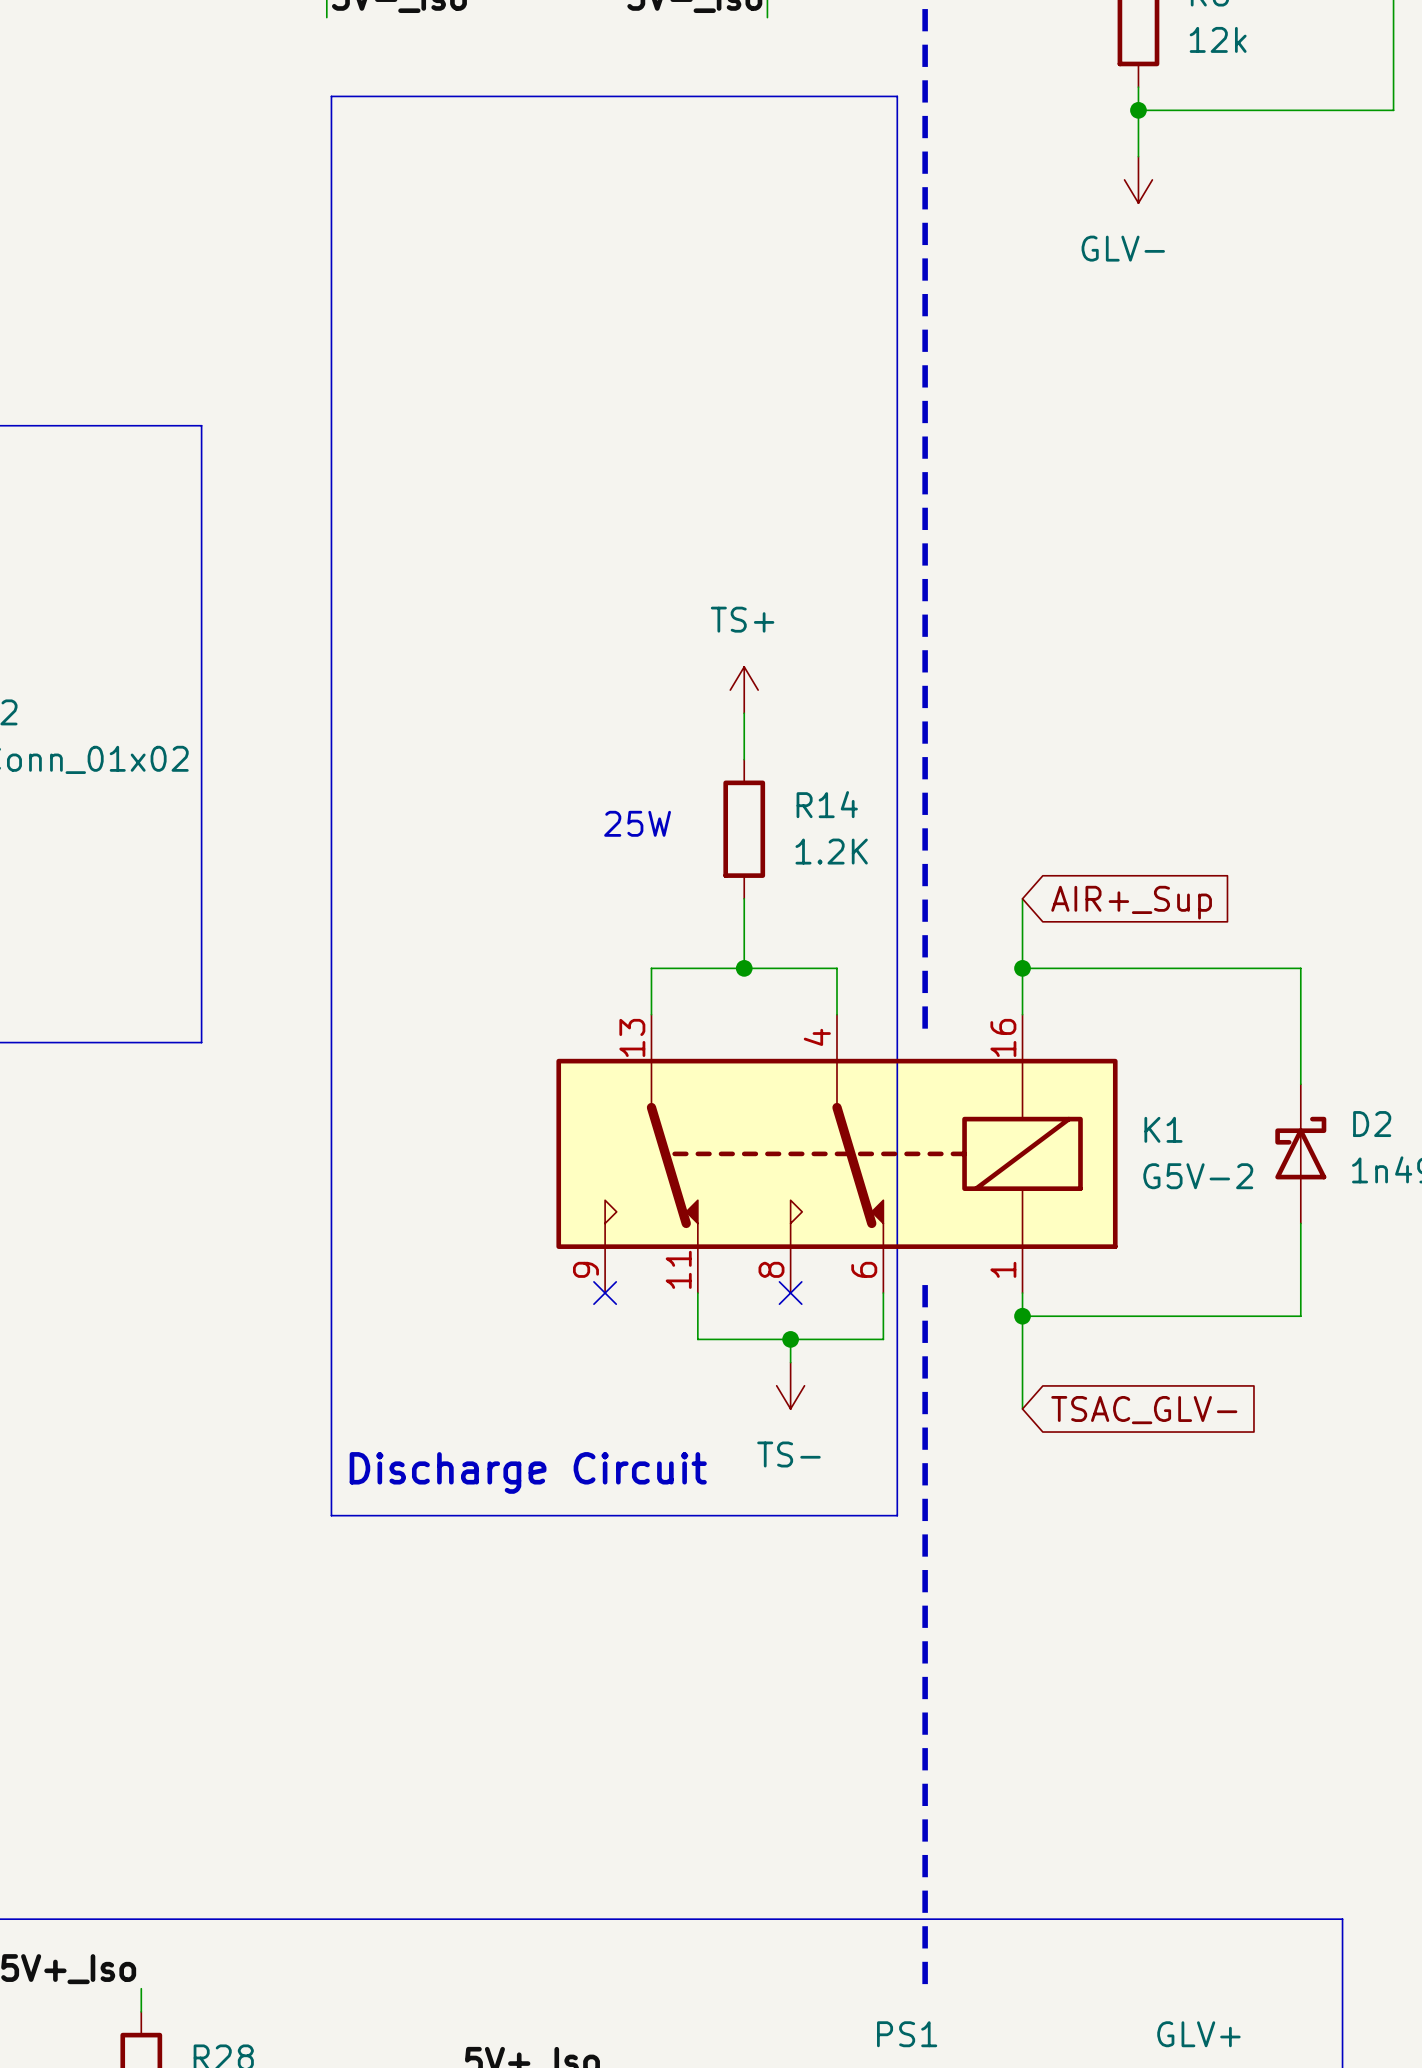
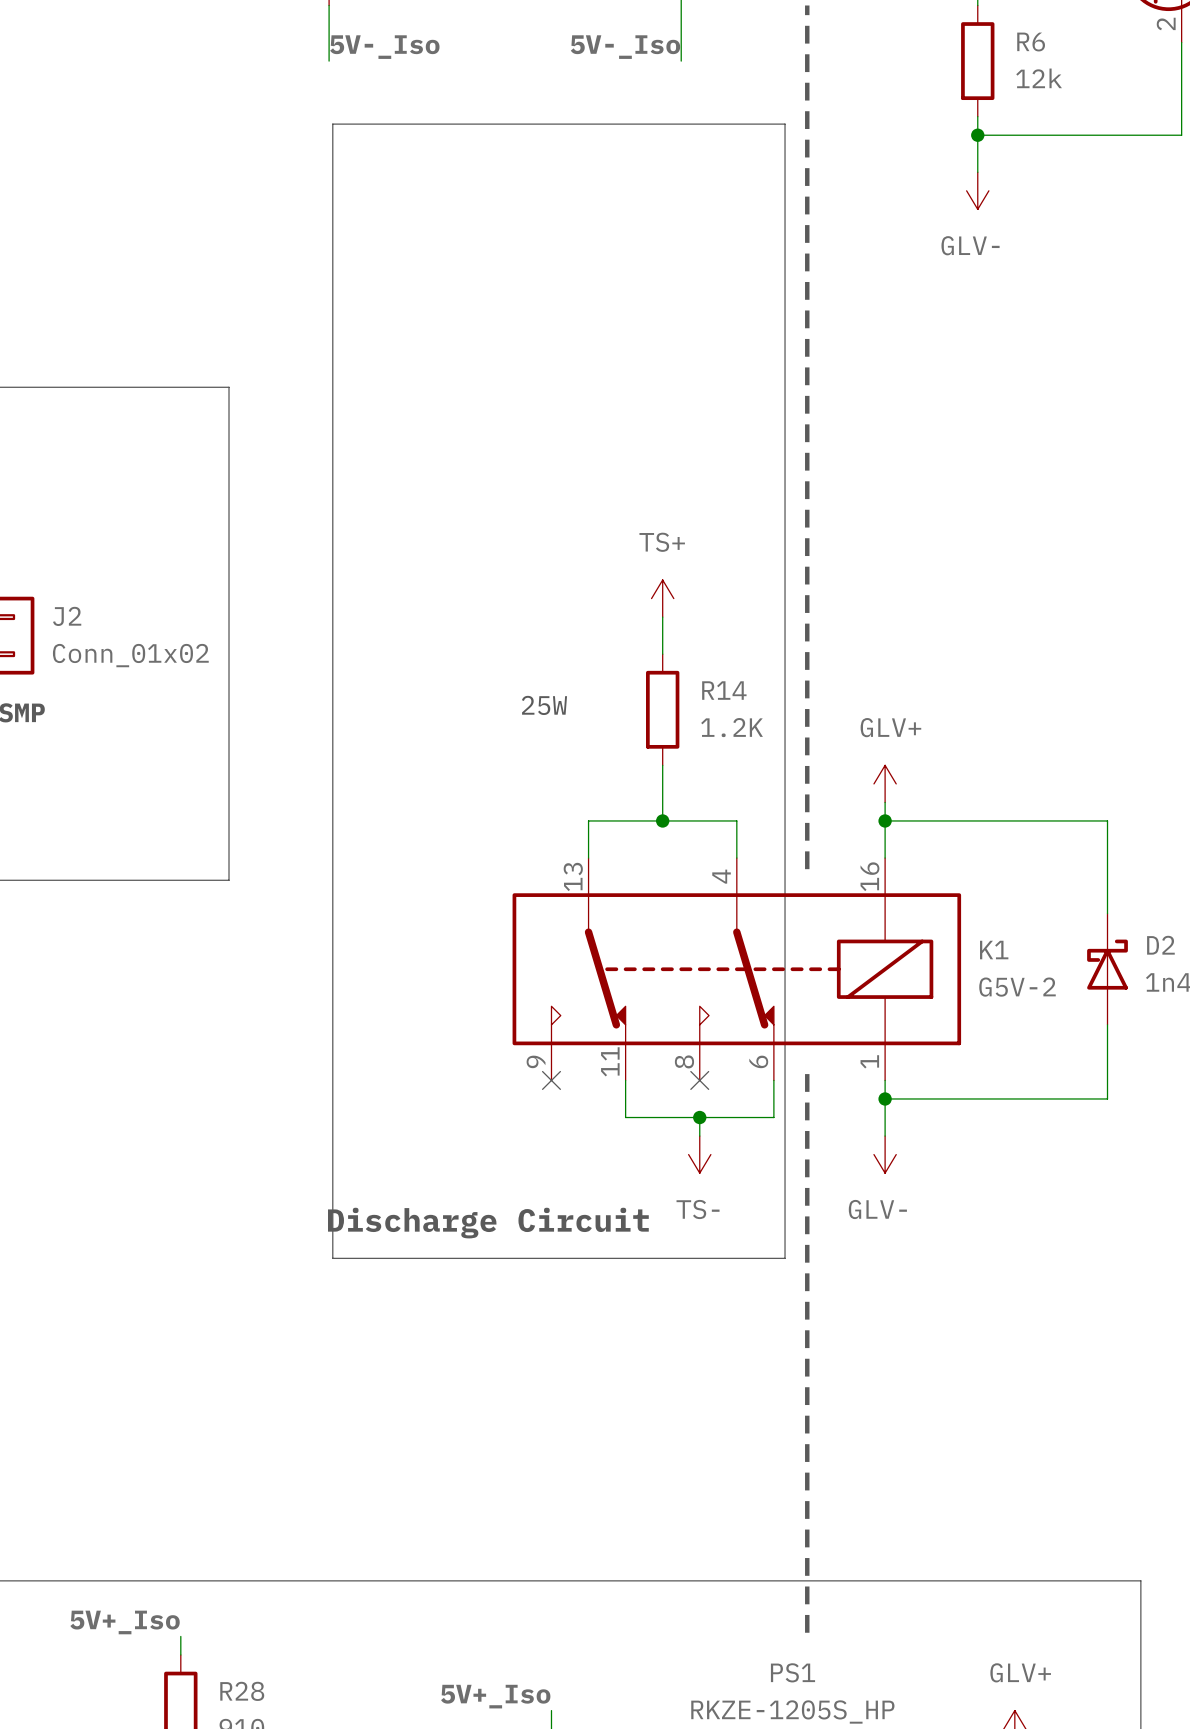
text position: 25W (637, 823) -> 25W (544, 705)
global label: AIR+_Sup (1131, 902) -> none
power symbol: none -> GLV+ (885, 783)
power symbol: none -> GLV- (885, 1154)
global label: TSAC_GLV- (1144, 1410) -> none

